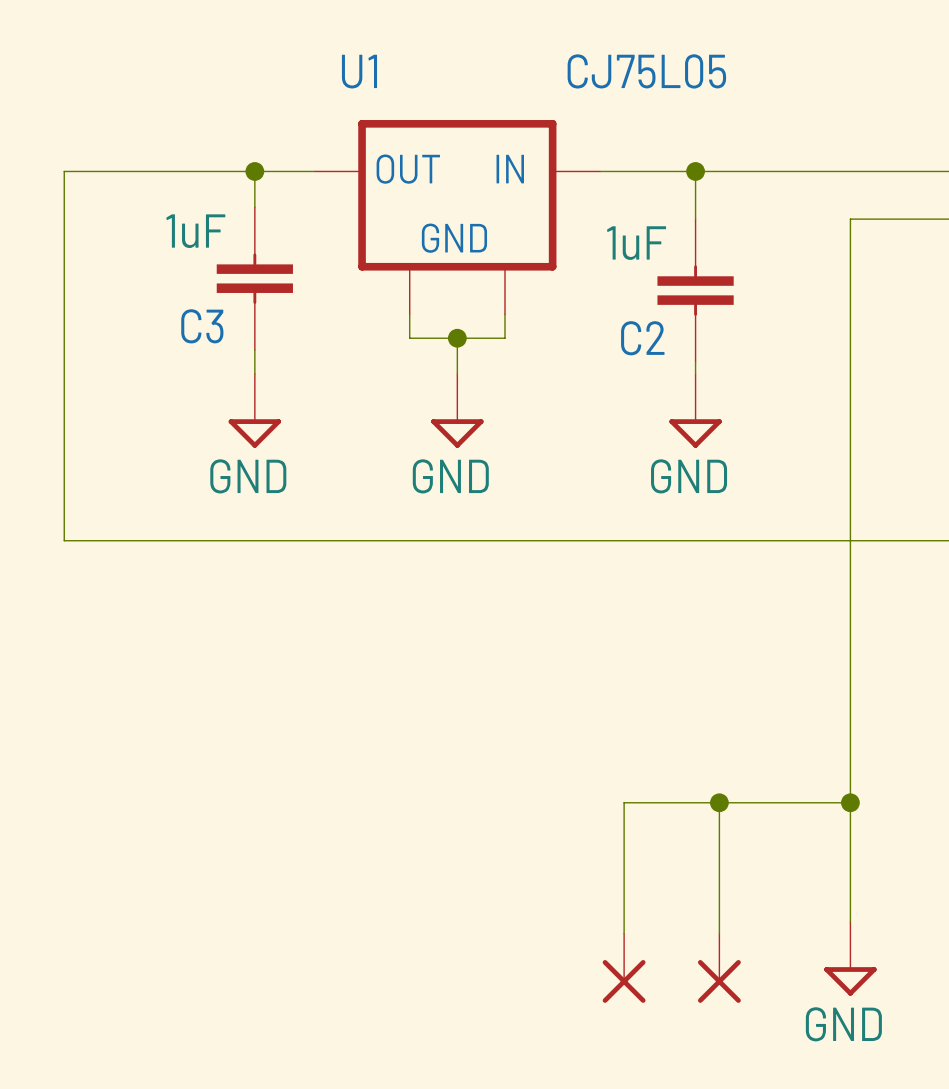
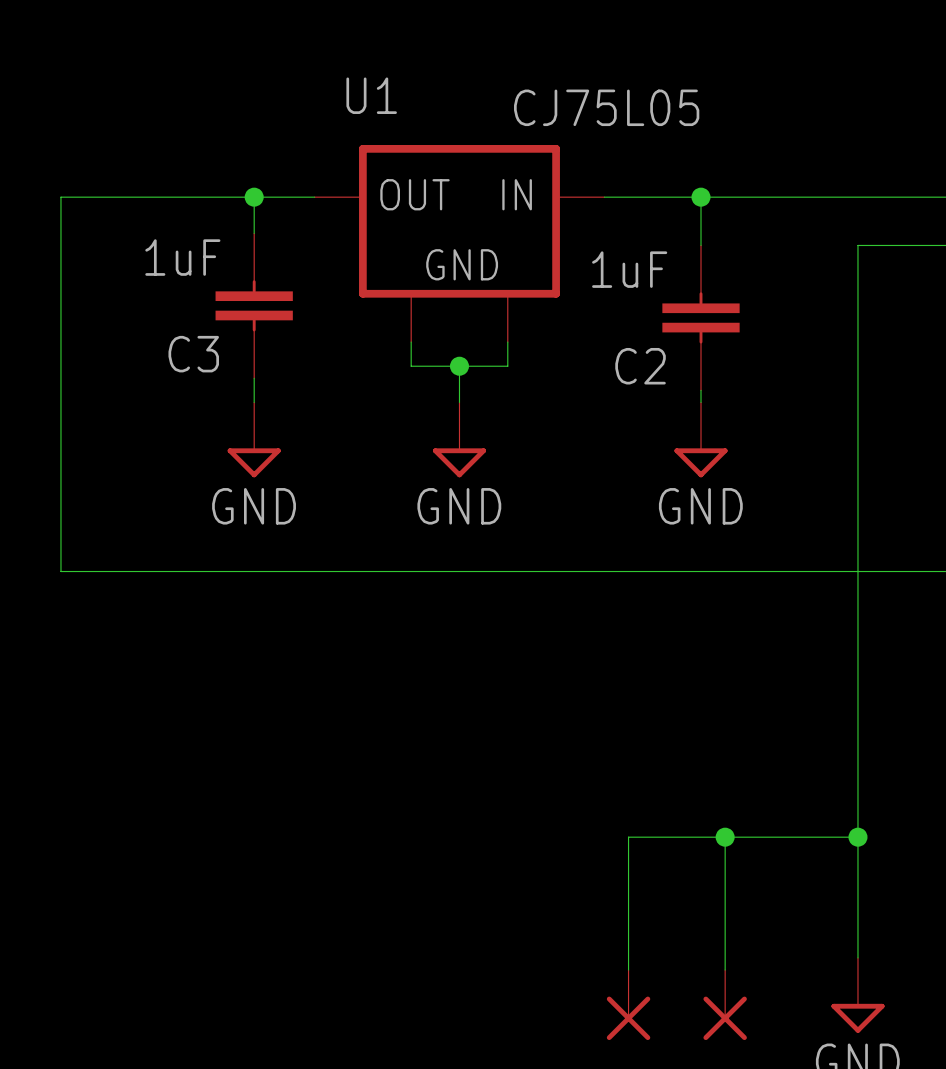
text position: CJ75L05 (646, 71) -> CJ75L05 (606, 107)

